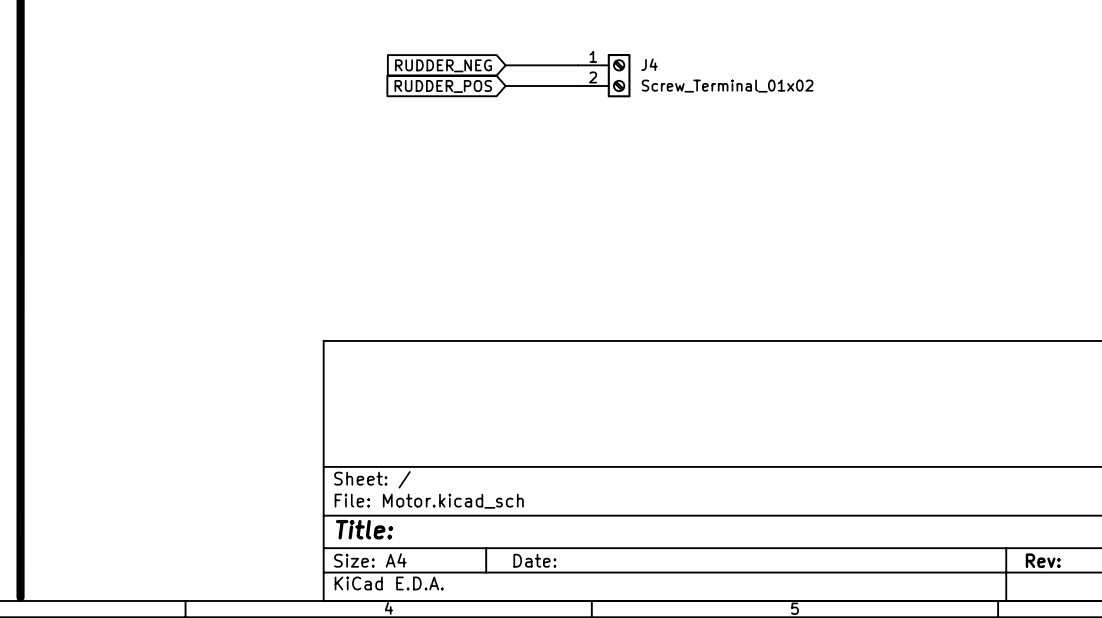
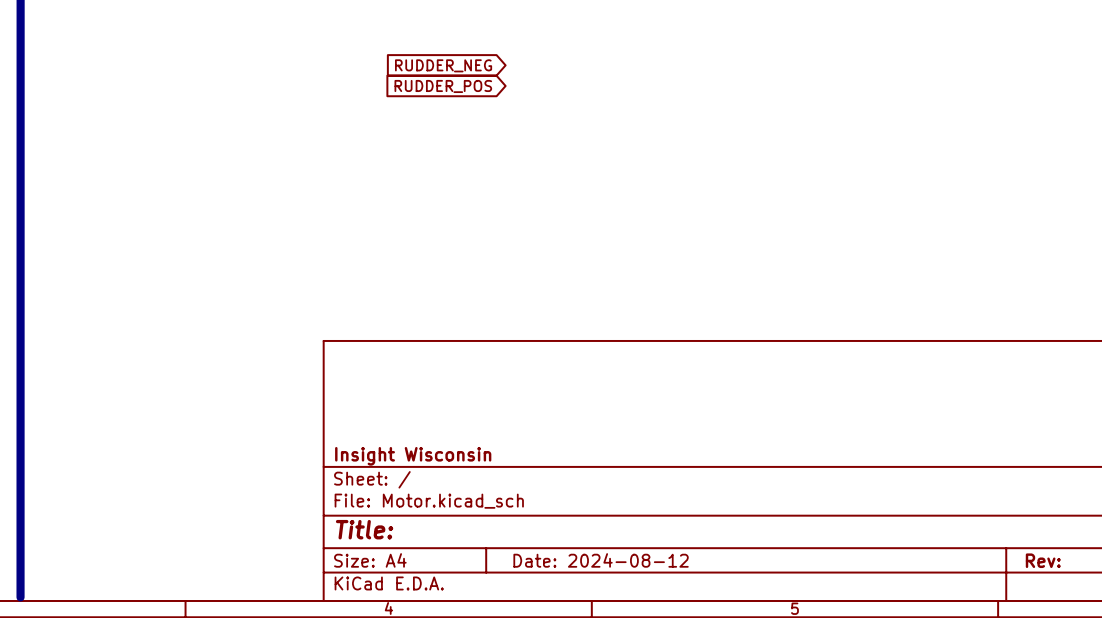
wire: (505, 65) (577, 65) -> none
J4: Screw_Terminal_01x02 (604, 75) -> none
wire: (505, 85) (577, 85) -> none
title block: none -> Insight Wisconsin (413, 456)
title block: Date: (534, 560) -> Date: 2024-08-12 (601, 560)

